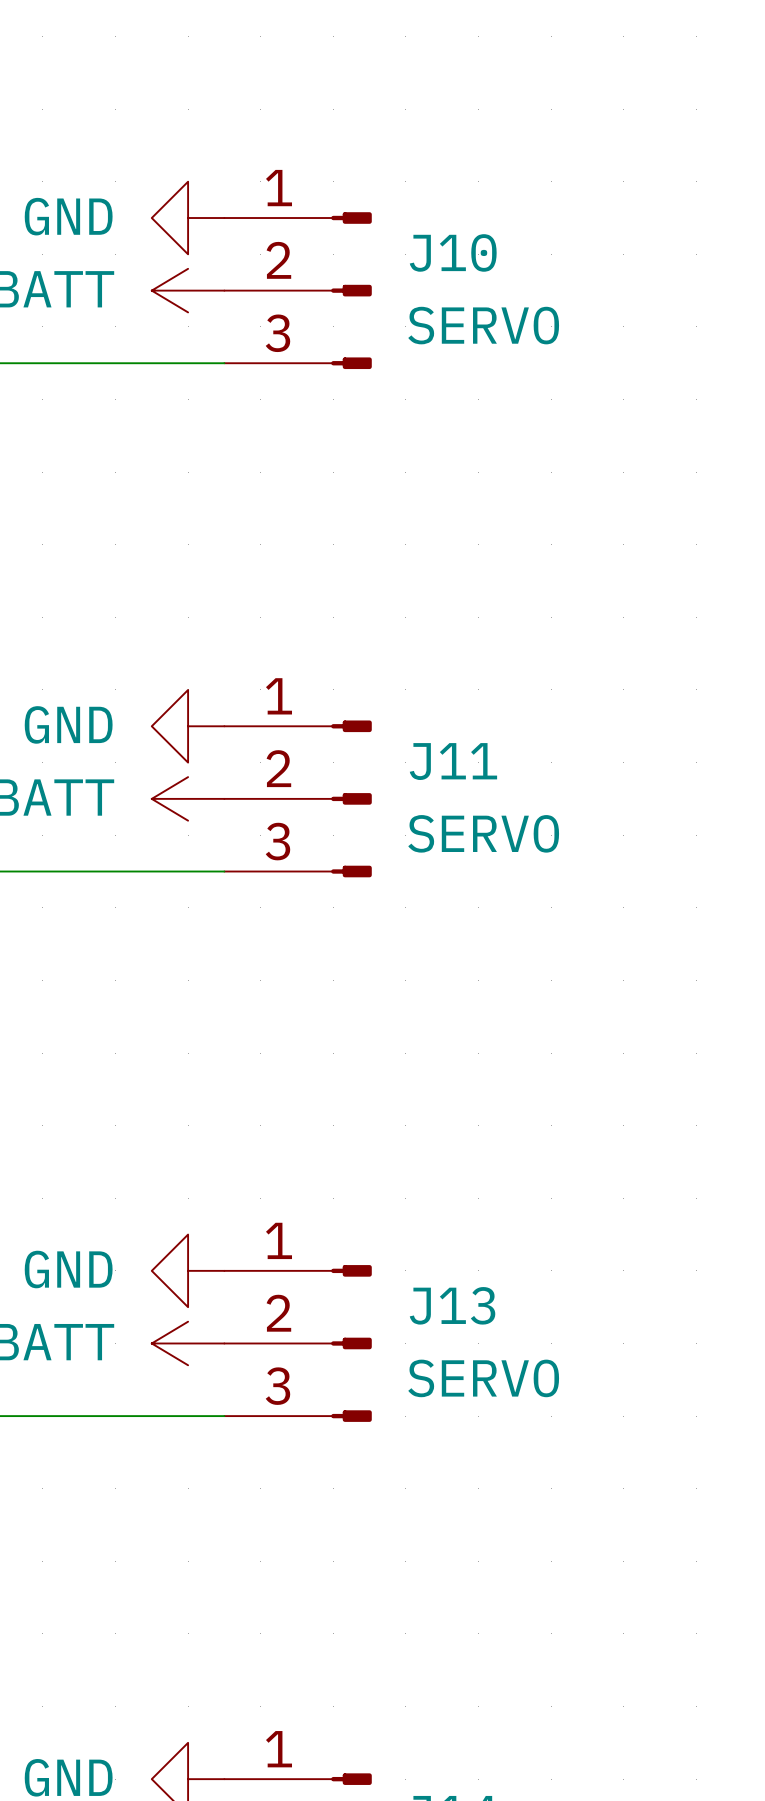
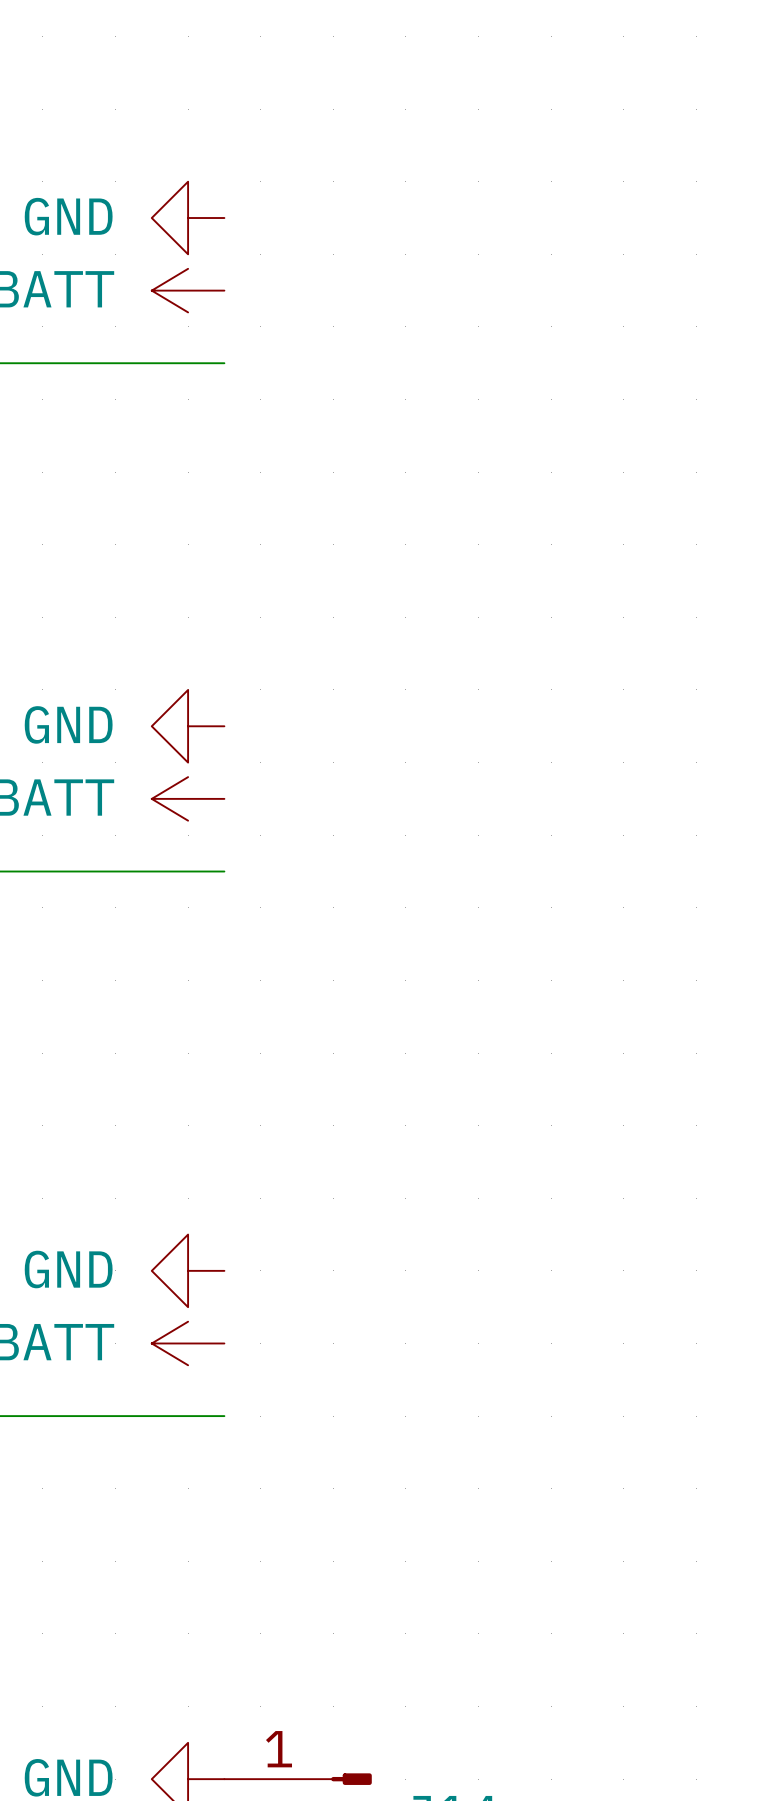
J10: SERVO (298, 290) -> none
J11: SERVO (298, 798) -> none
J13: SERVO (298, 1343) -> none

